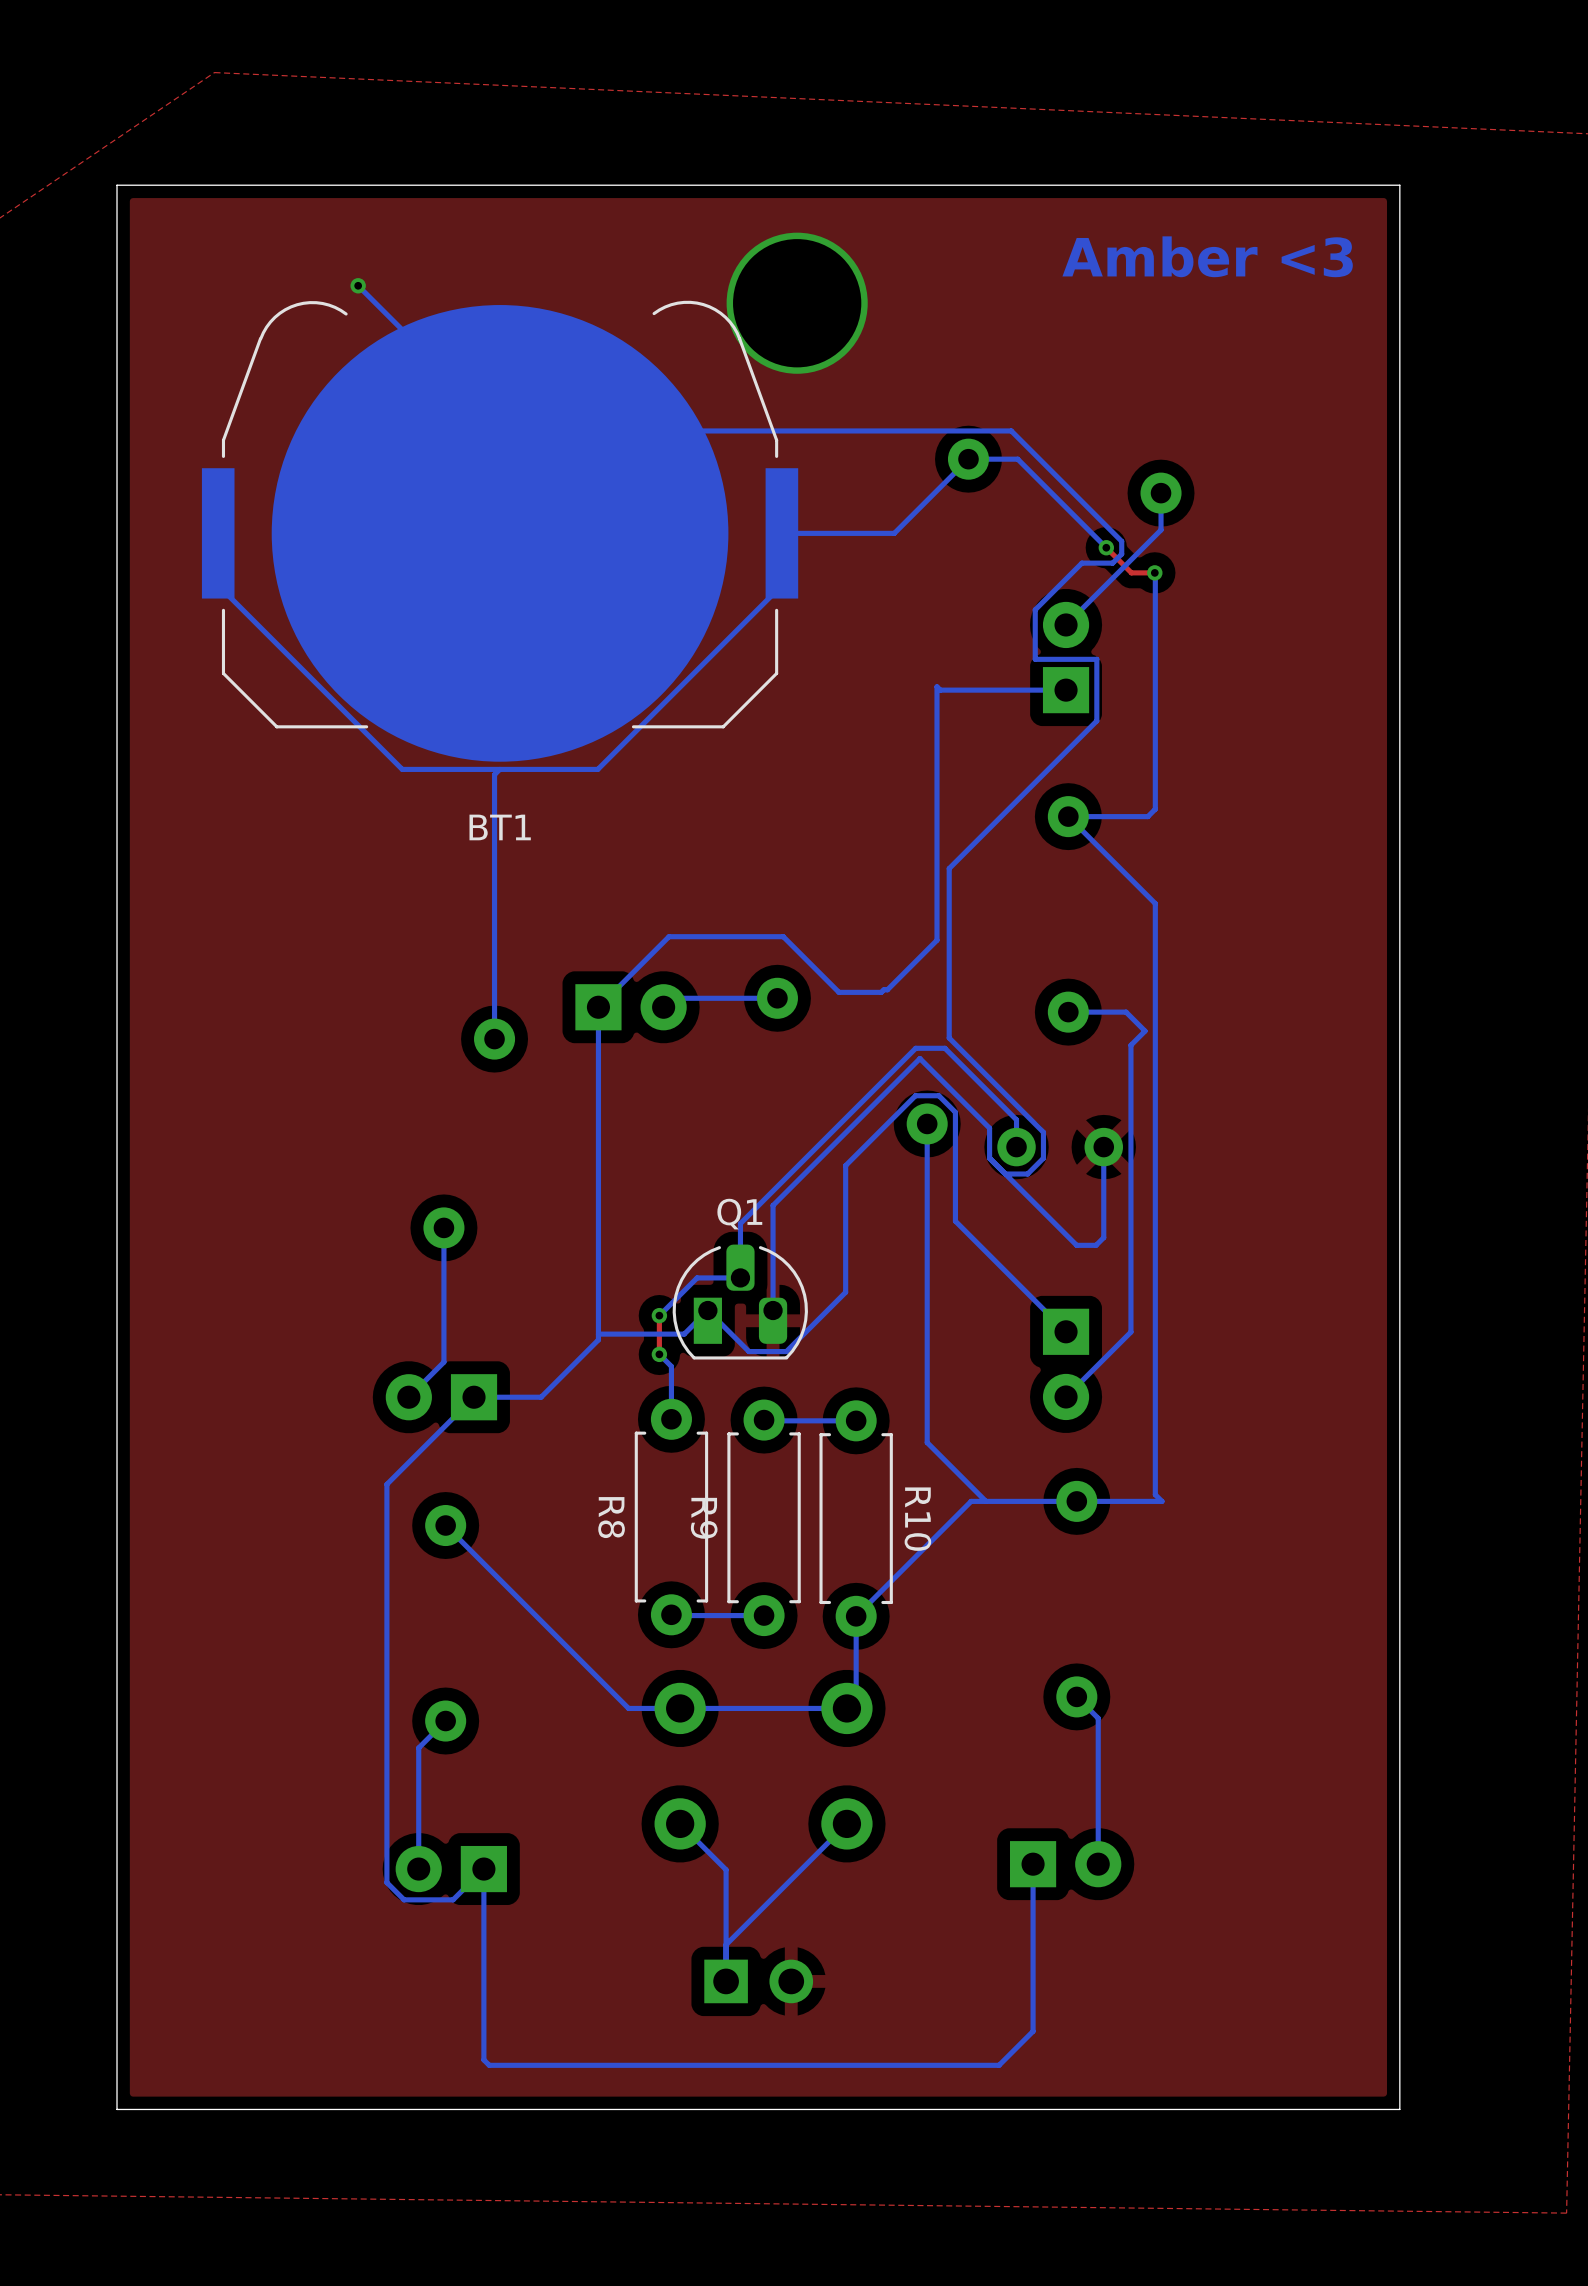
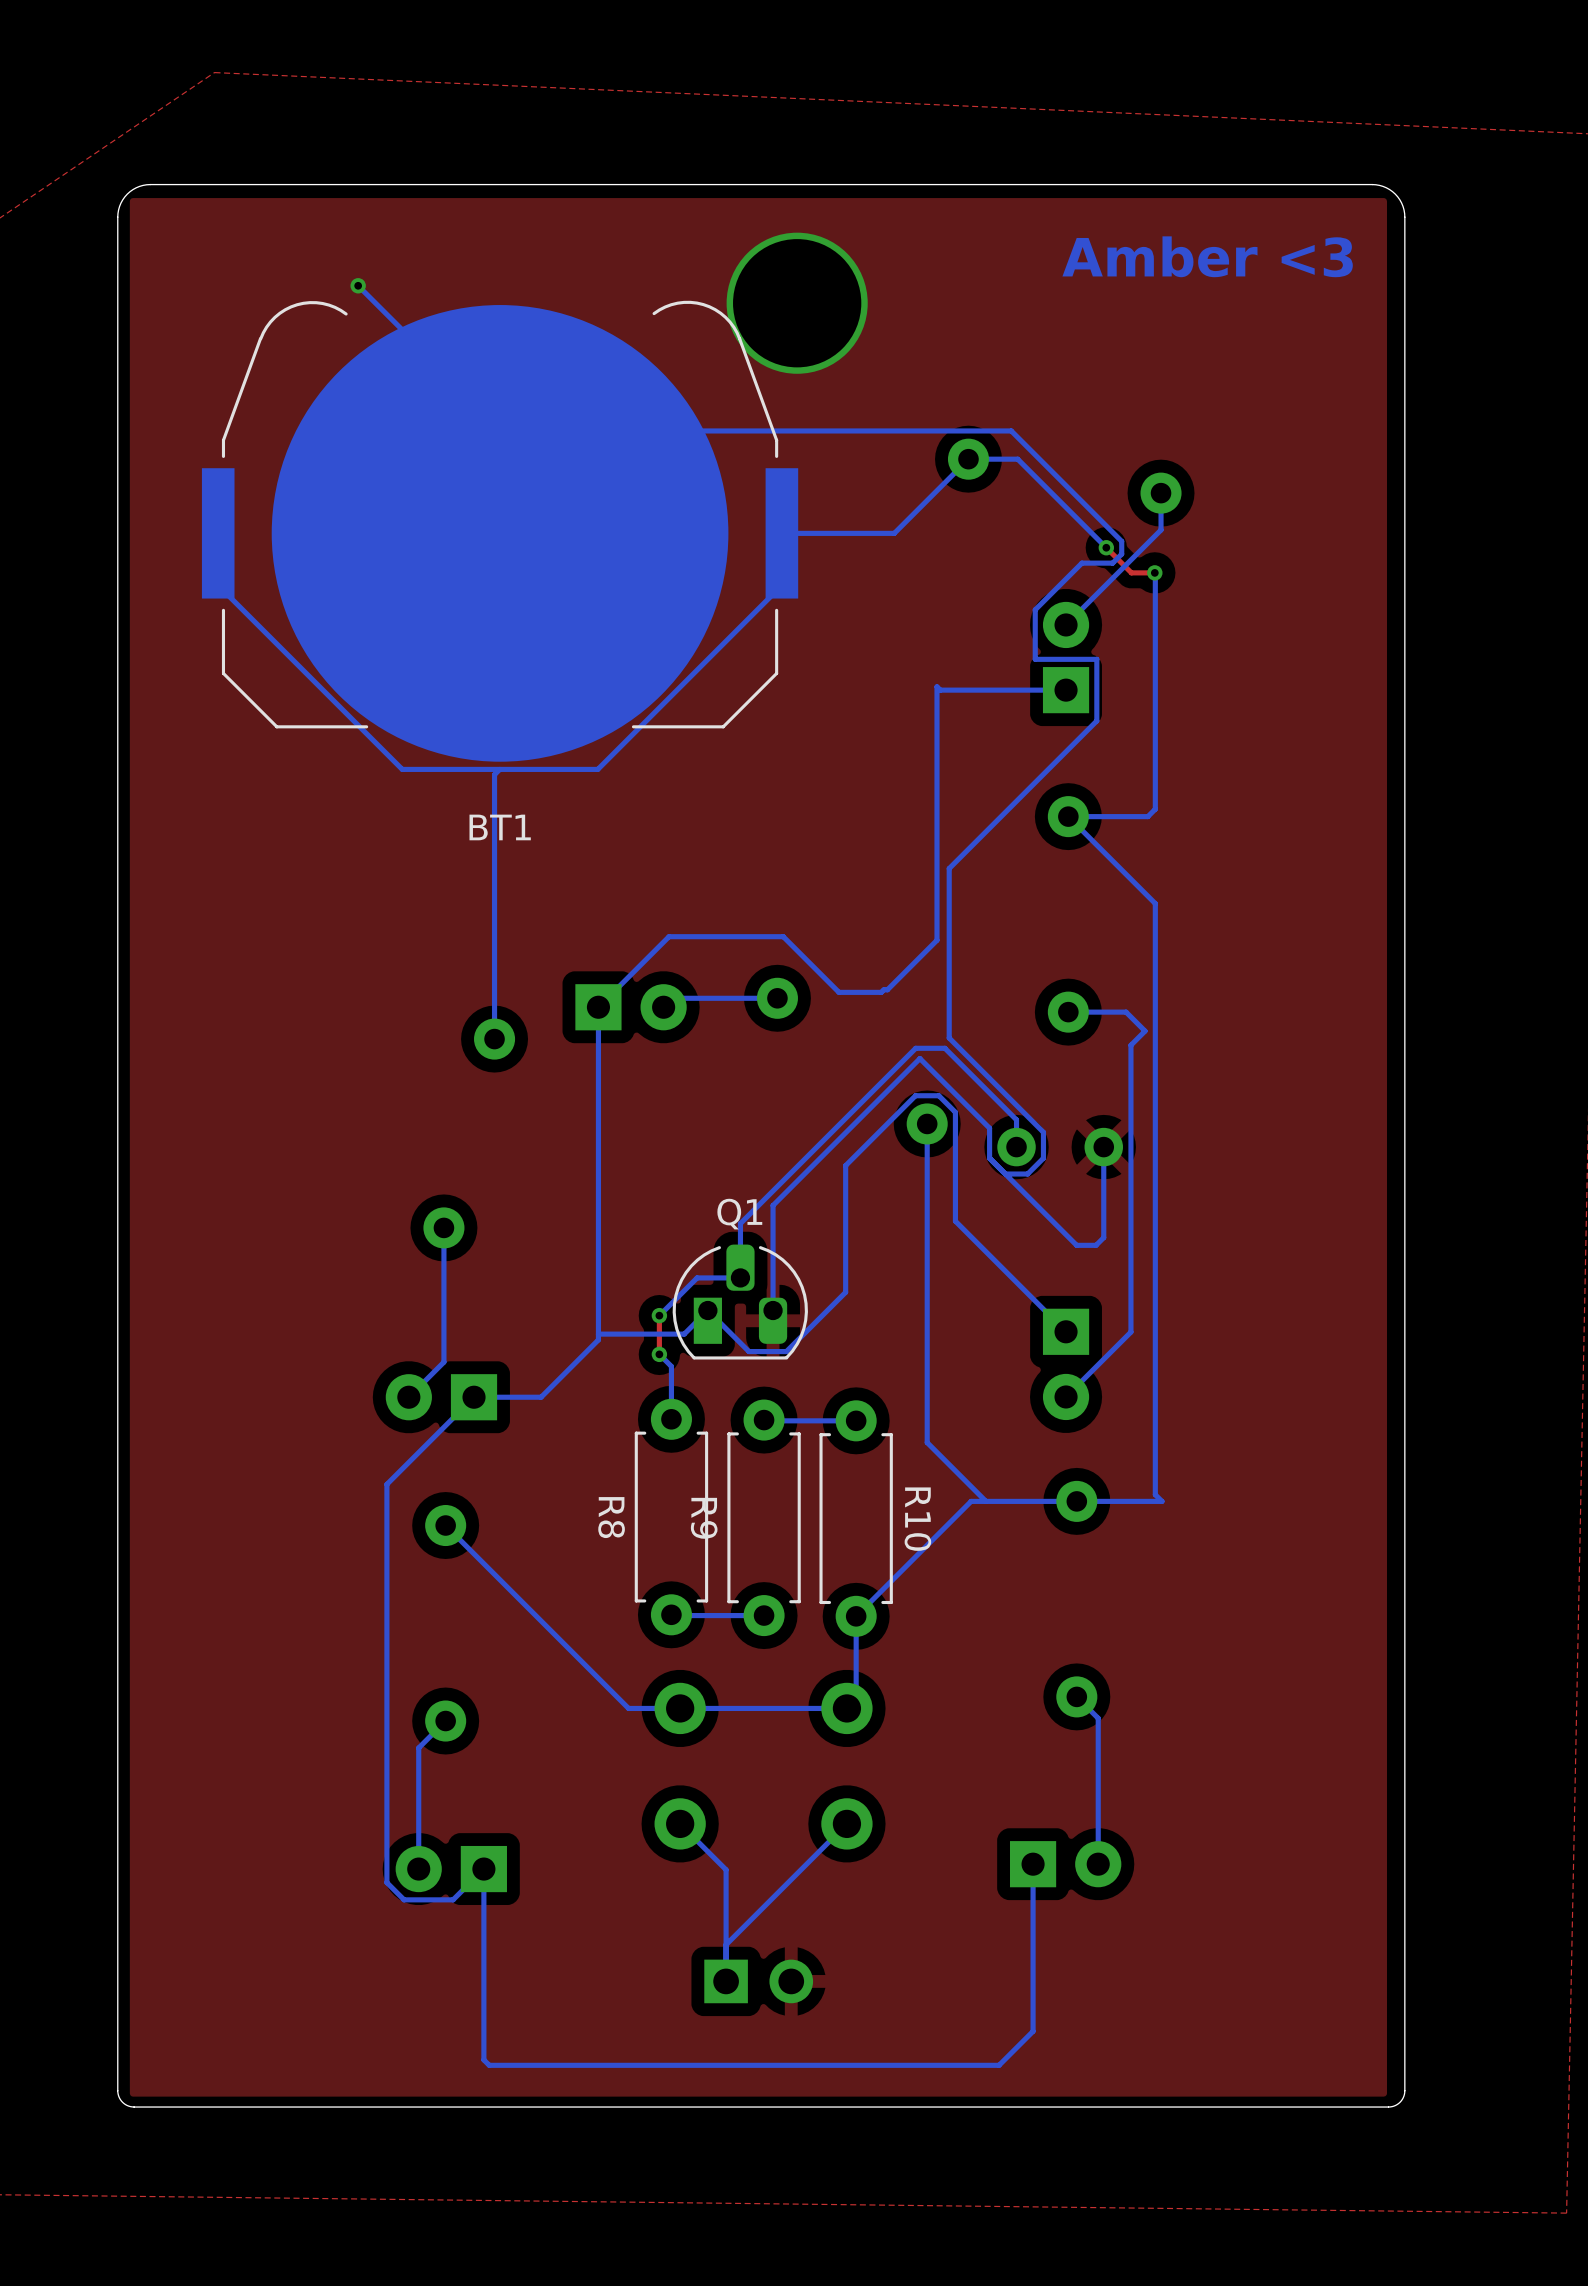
board edge: (1399, 185) (117, 185) (117, 2109) (1399, 2109) (1399, 185) -> (1372, 184) (1386, 187) (1395, 194) (1401, 203) (1404, 217) (1404, 2090) (1402, 2099) (1395, 2105) (1388, 2107) (134, 2107) (125, 2104) (119, 2097) (117, 2090) (117, 217) (122, 199) (133, 189) (150, 184) (1372, 184)

